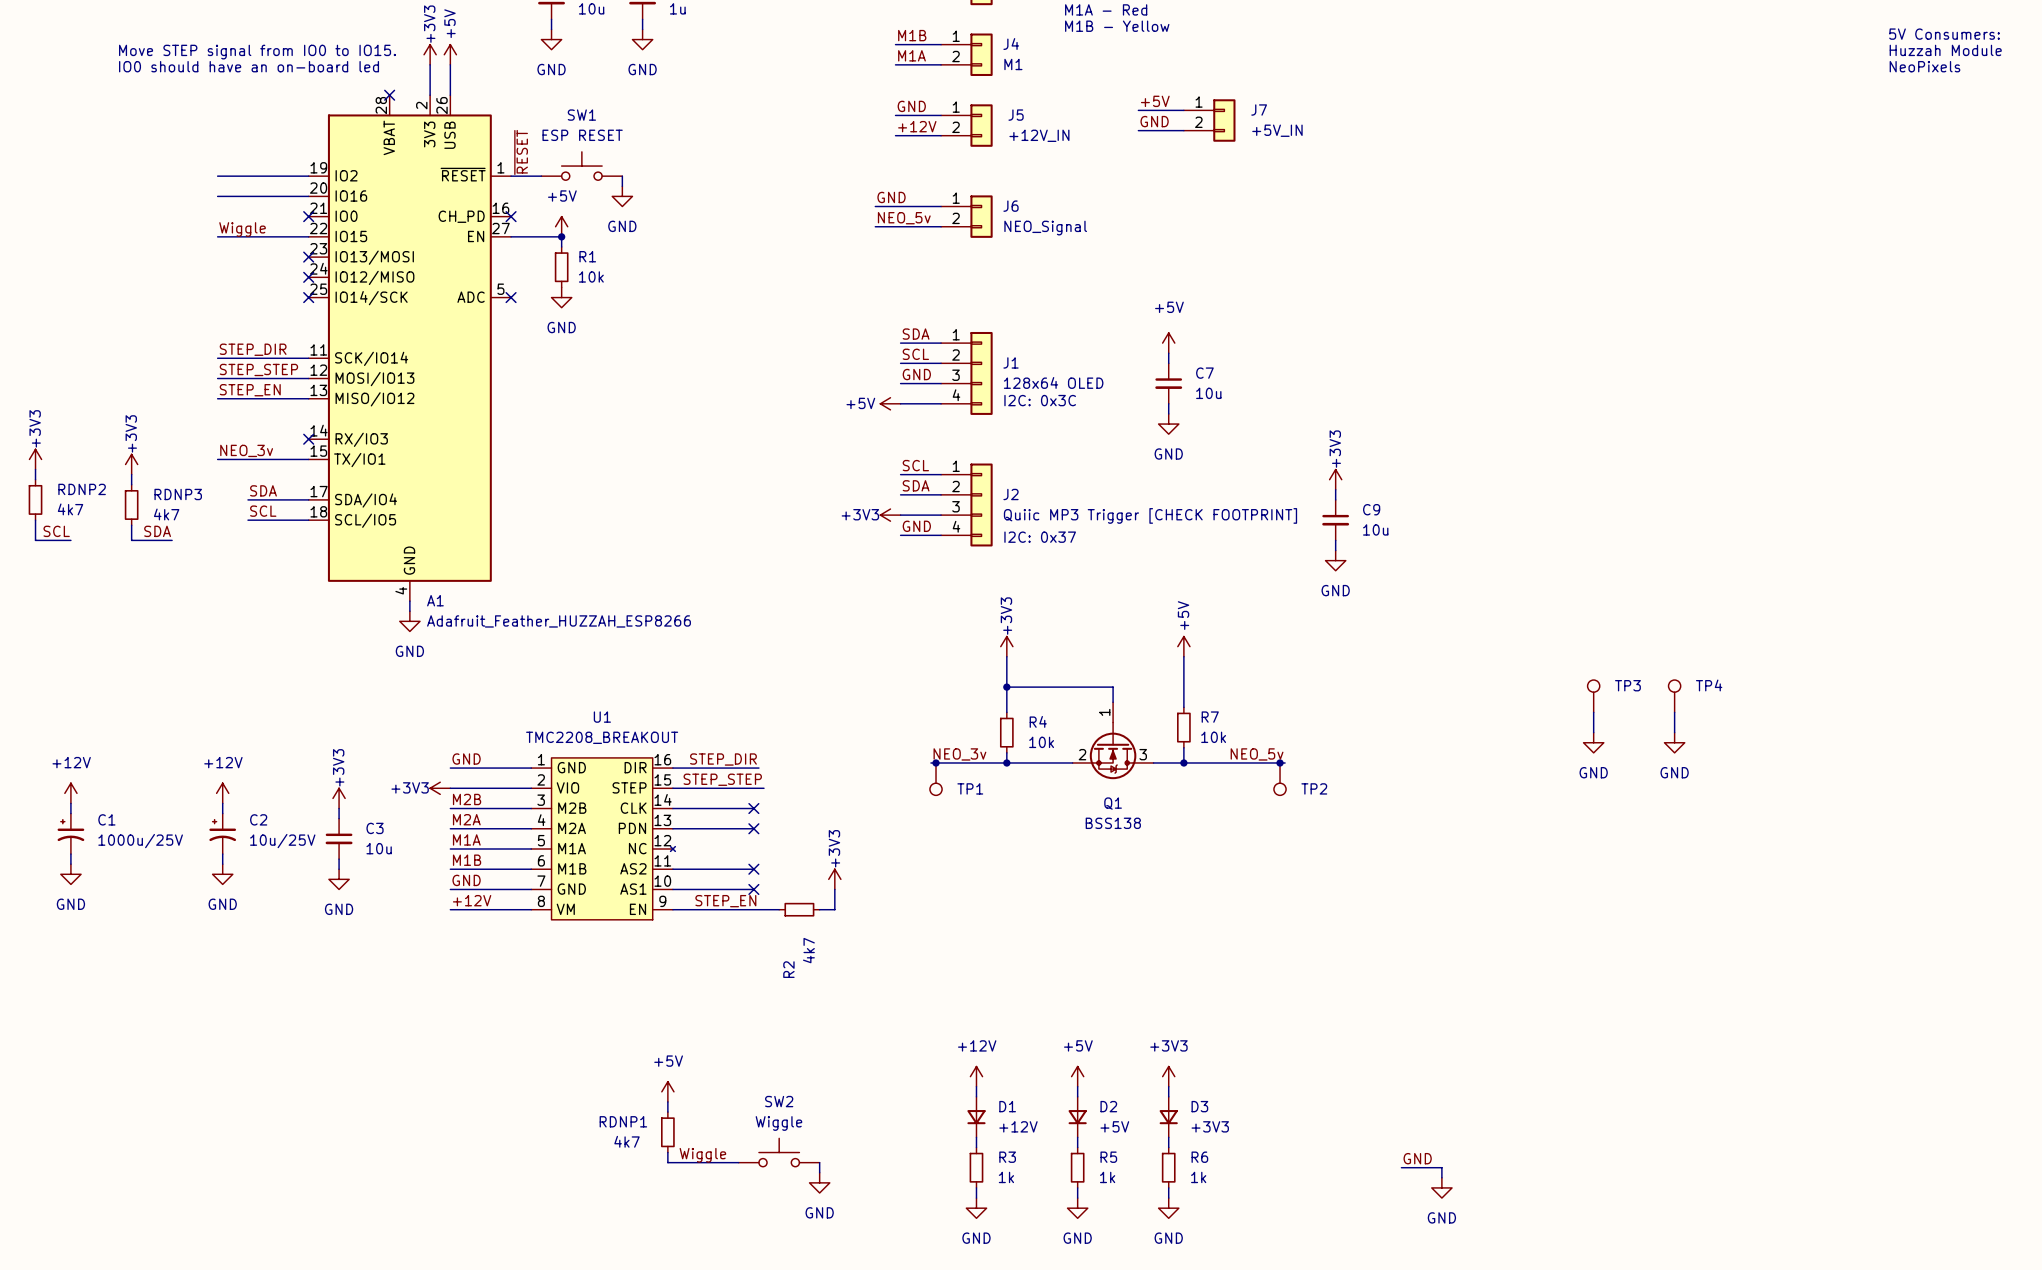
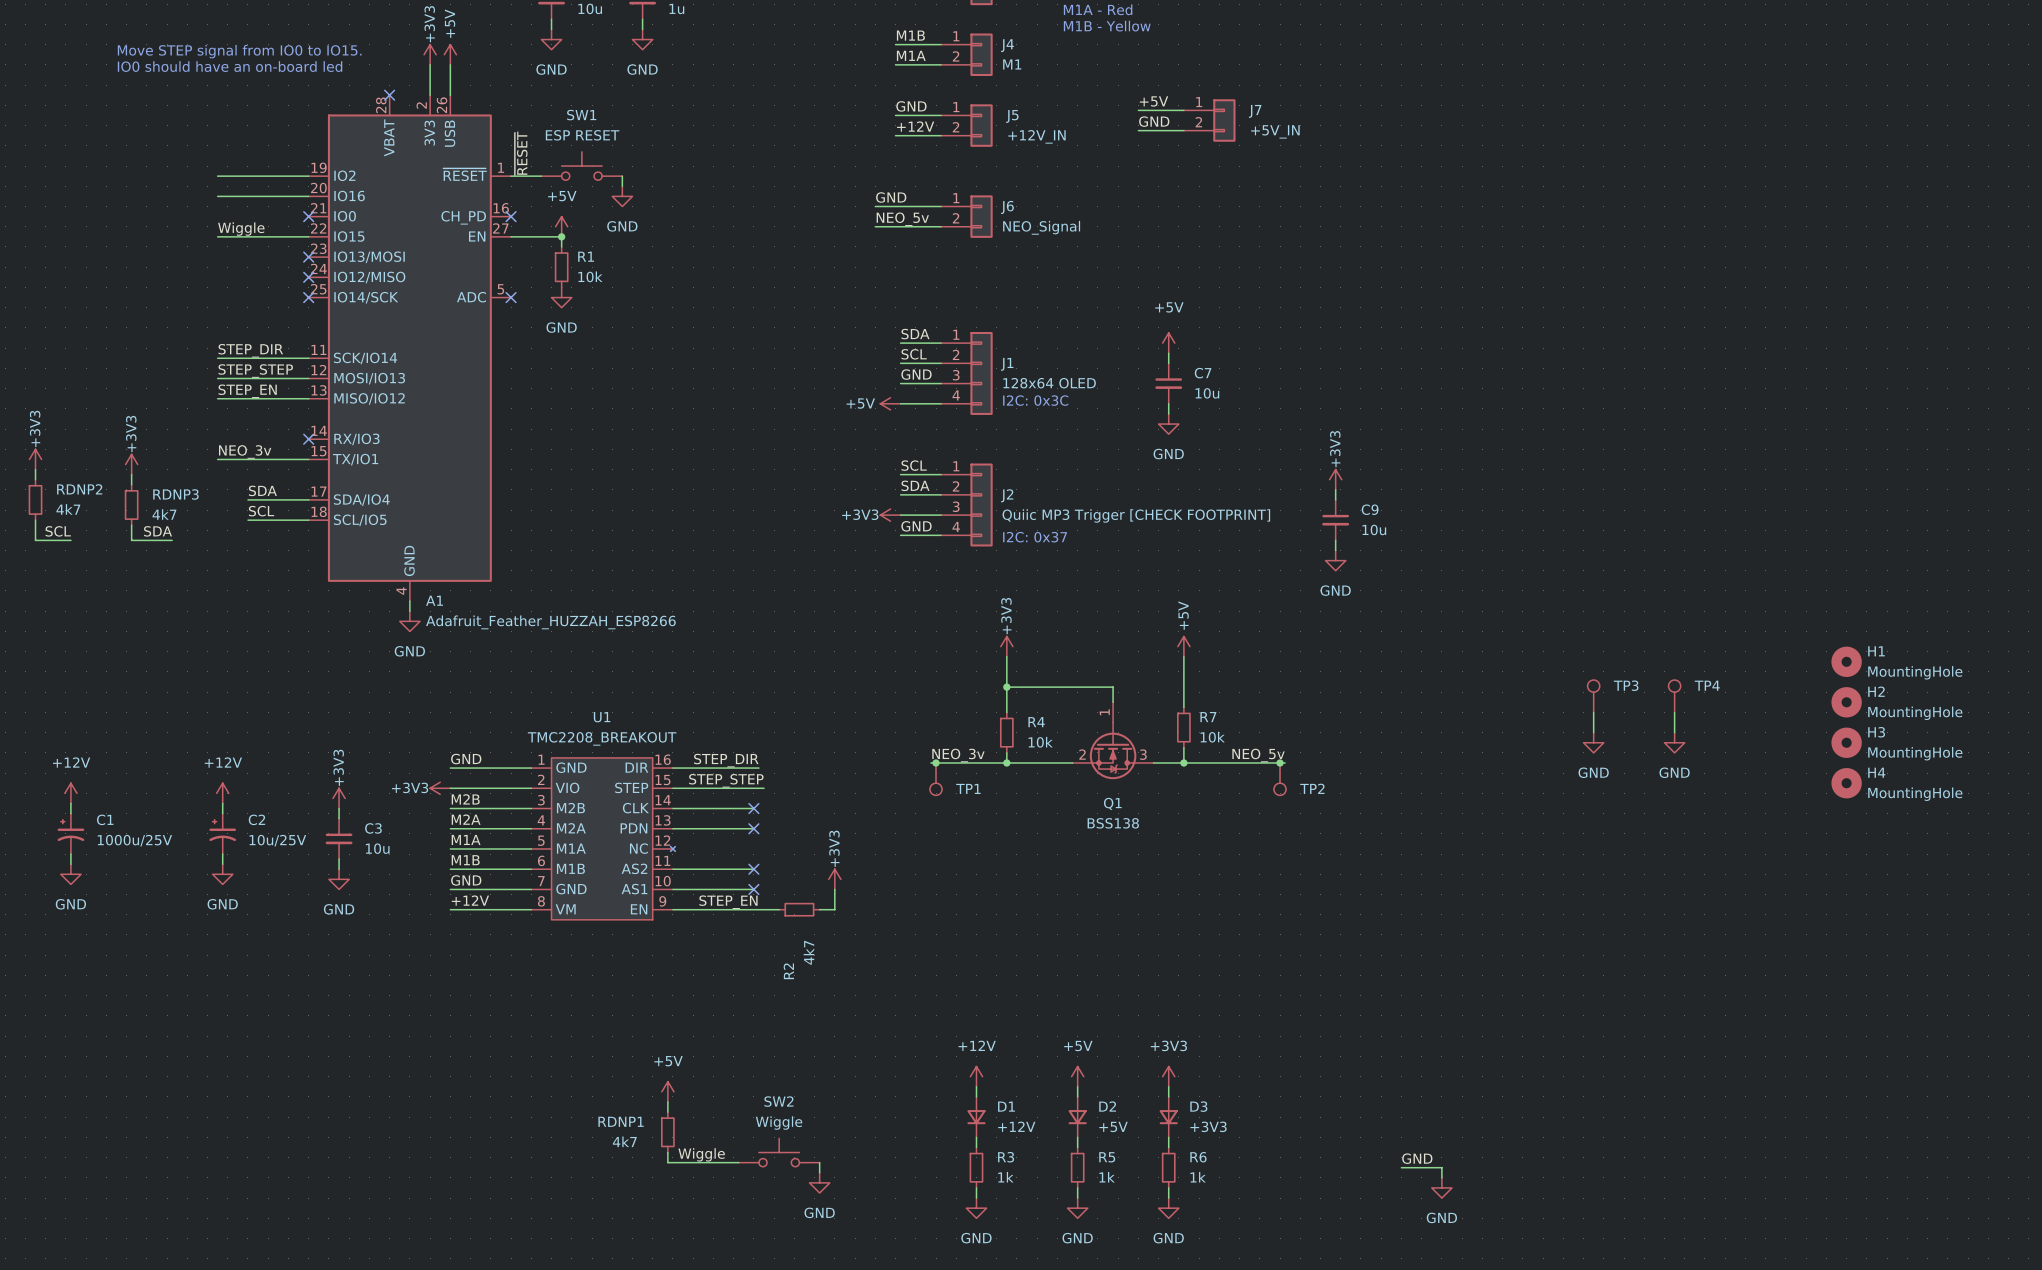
text: 5V Consumers: (1944, 34) -> none
text: Huzzah Module (1945, 50) -> none
text: NeoPixels (1924, 66) -> none
H1: none -> MountingHole (1846, 661)
H2: none -> MountingHole (1846, 702)
H3: none -> MountingHole (1846, 742)
H4: none -> MountingHole (1846, 783)

